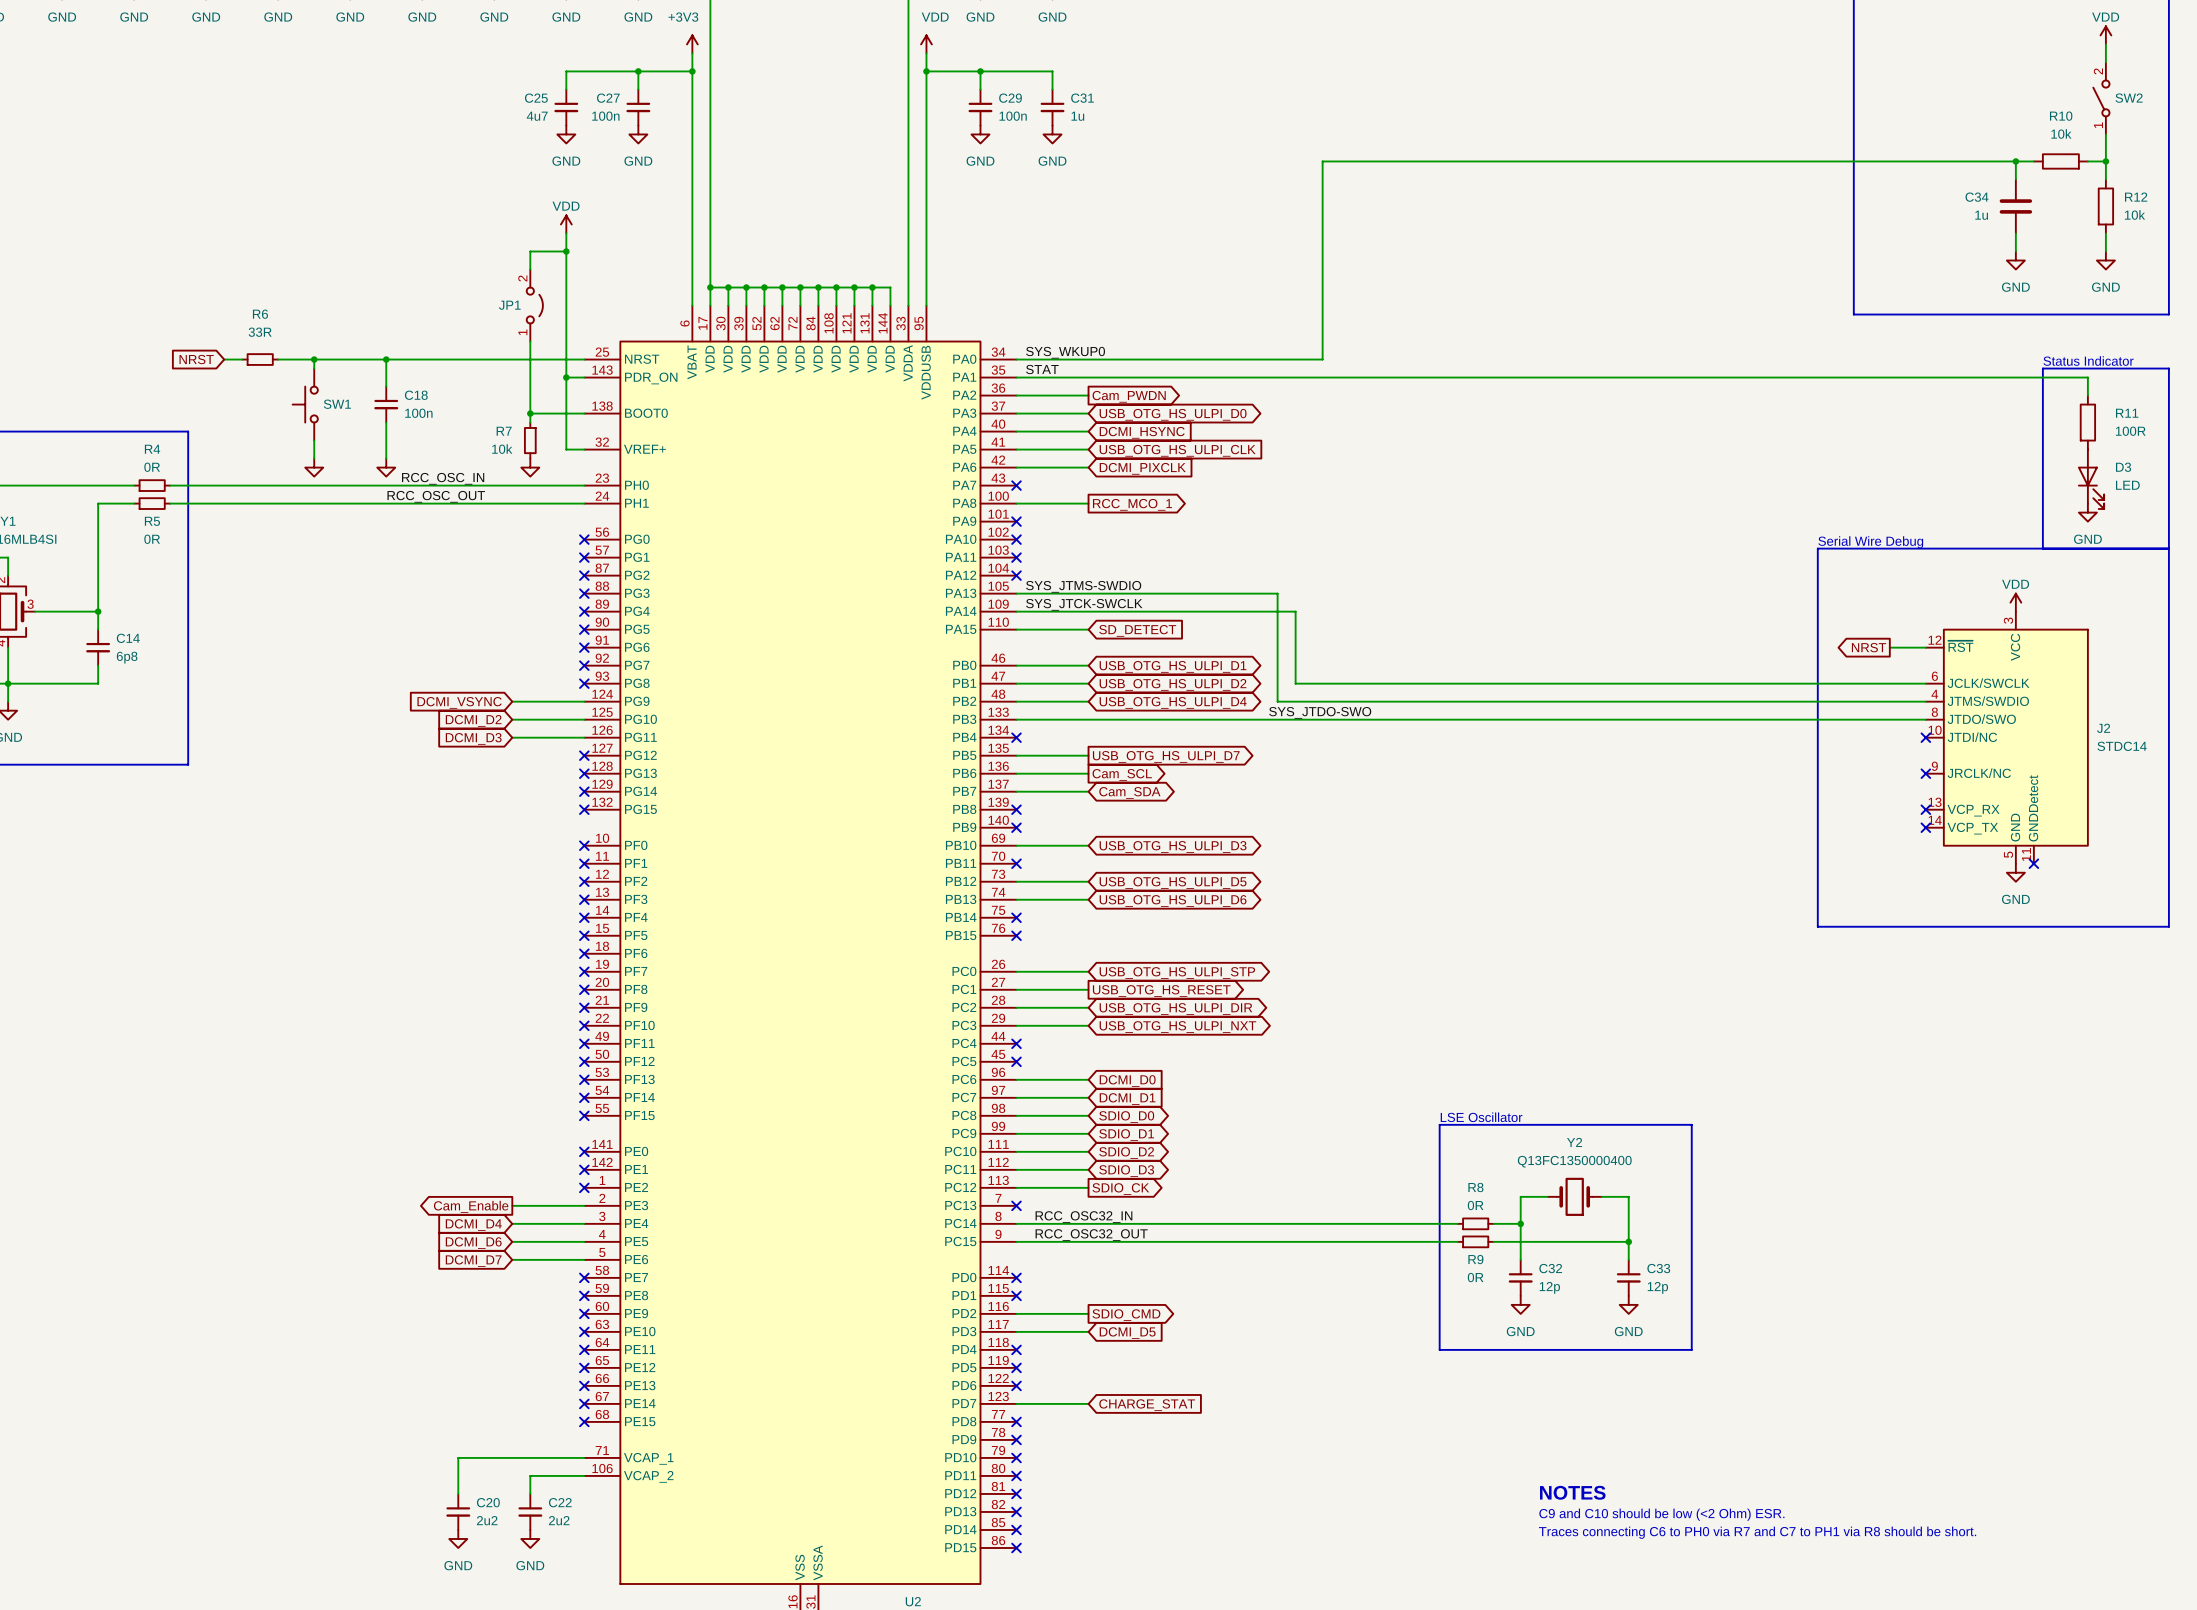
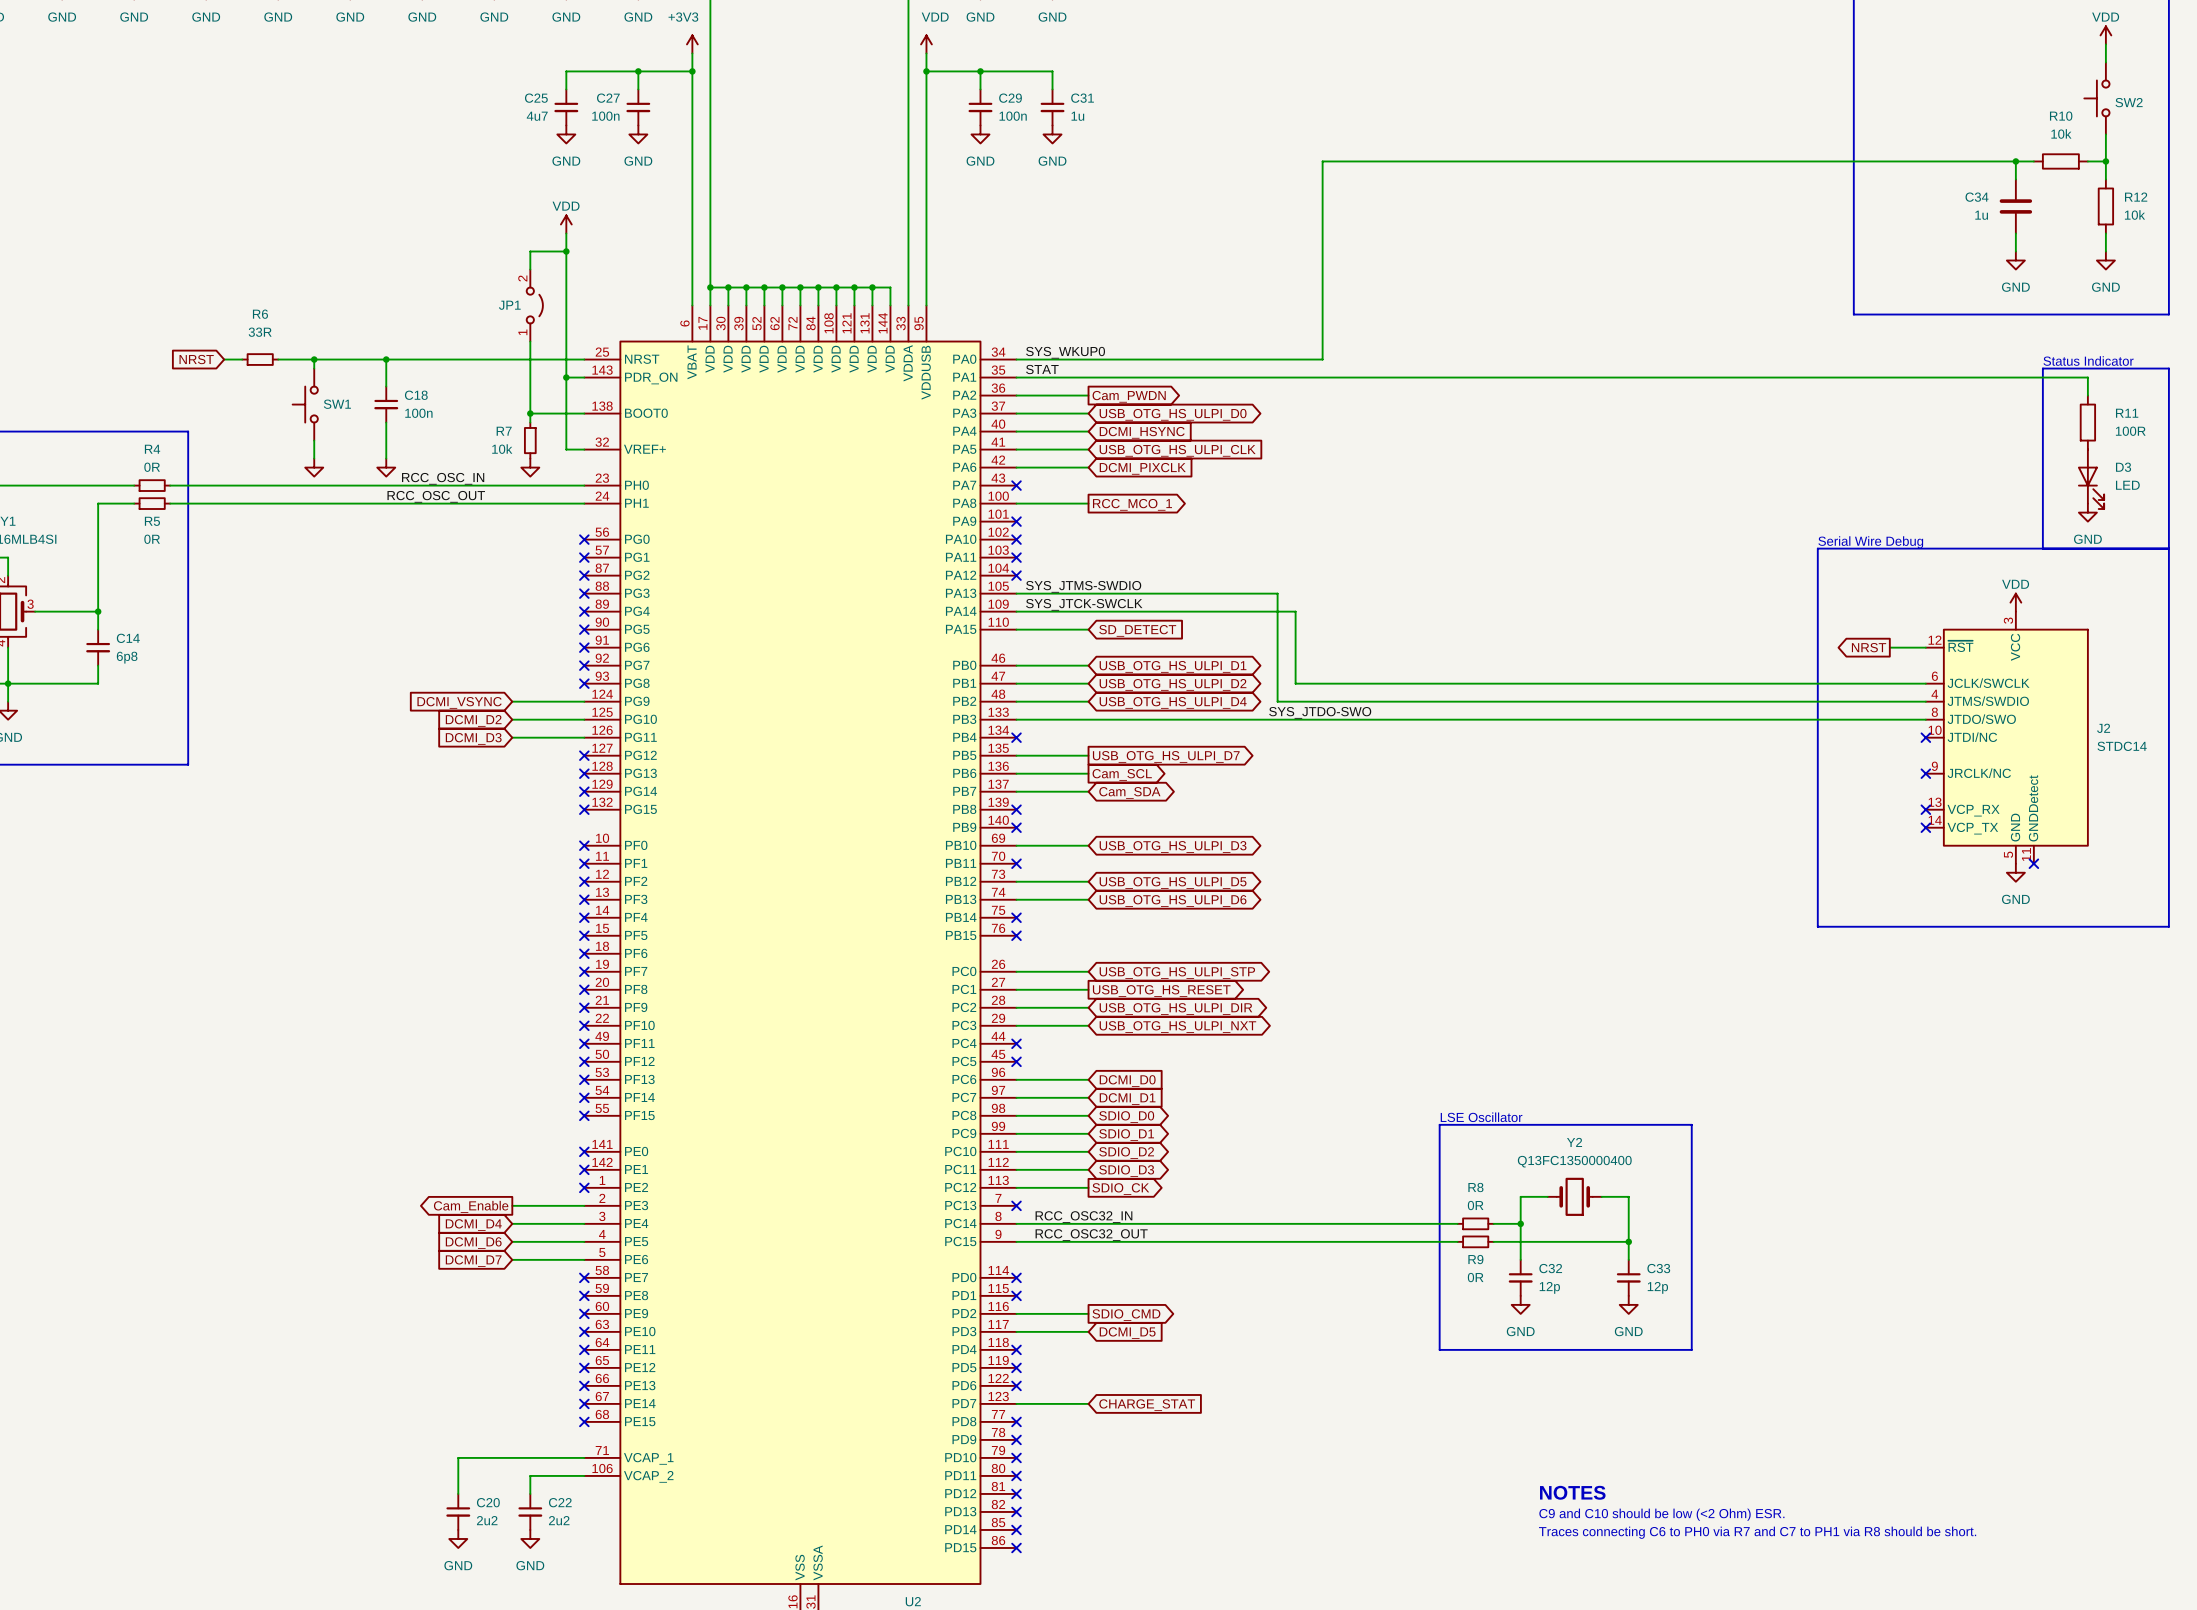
SW2 symbol: [2093, 62, 2110, 135] -> [2084, 62, 2110, 135]

